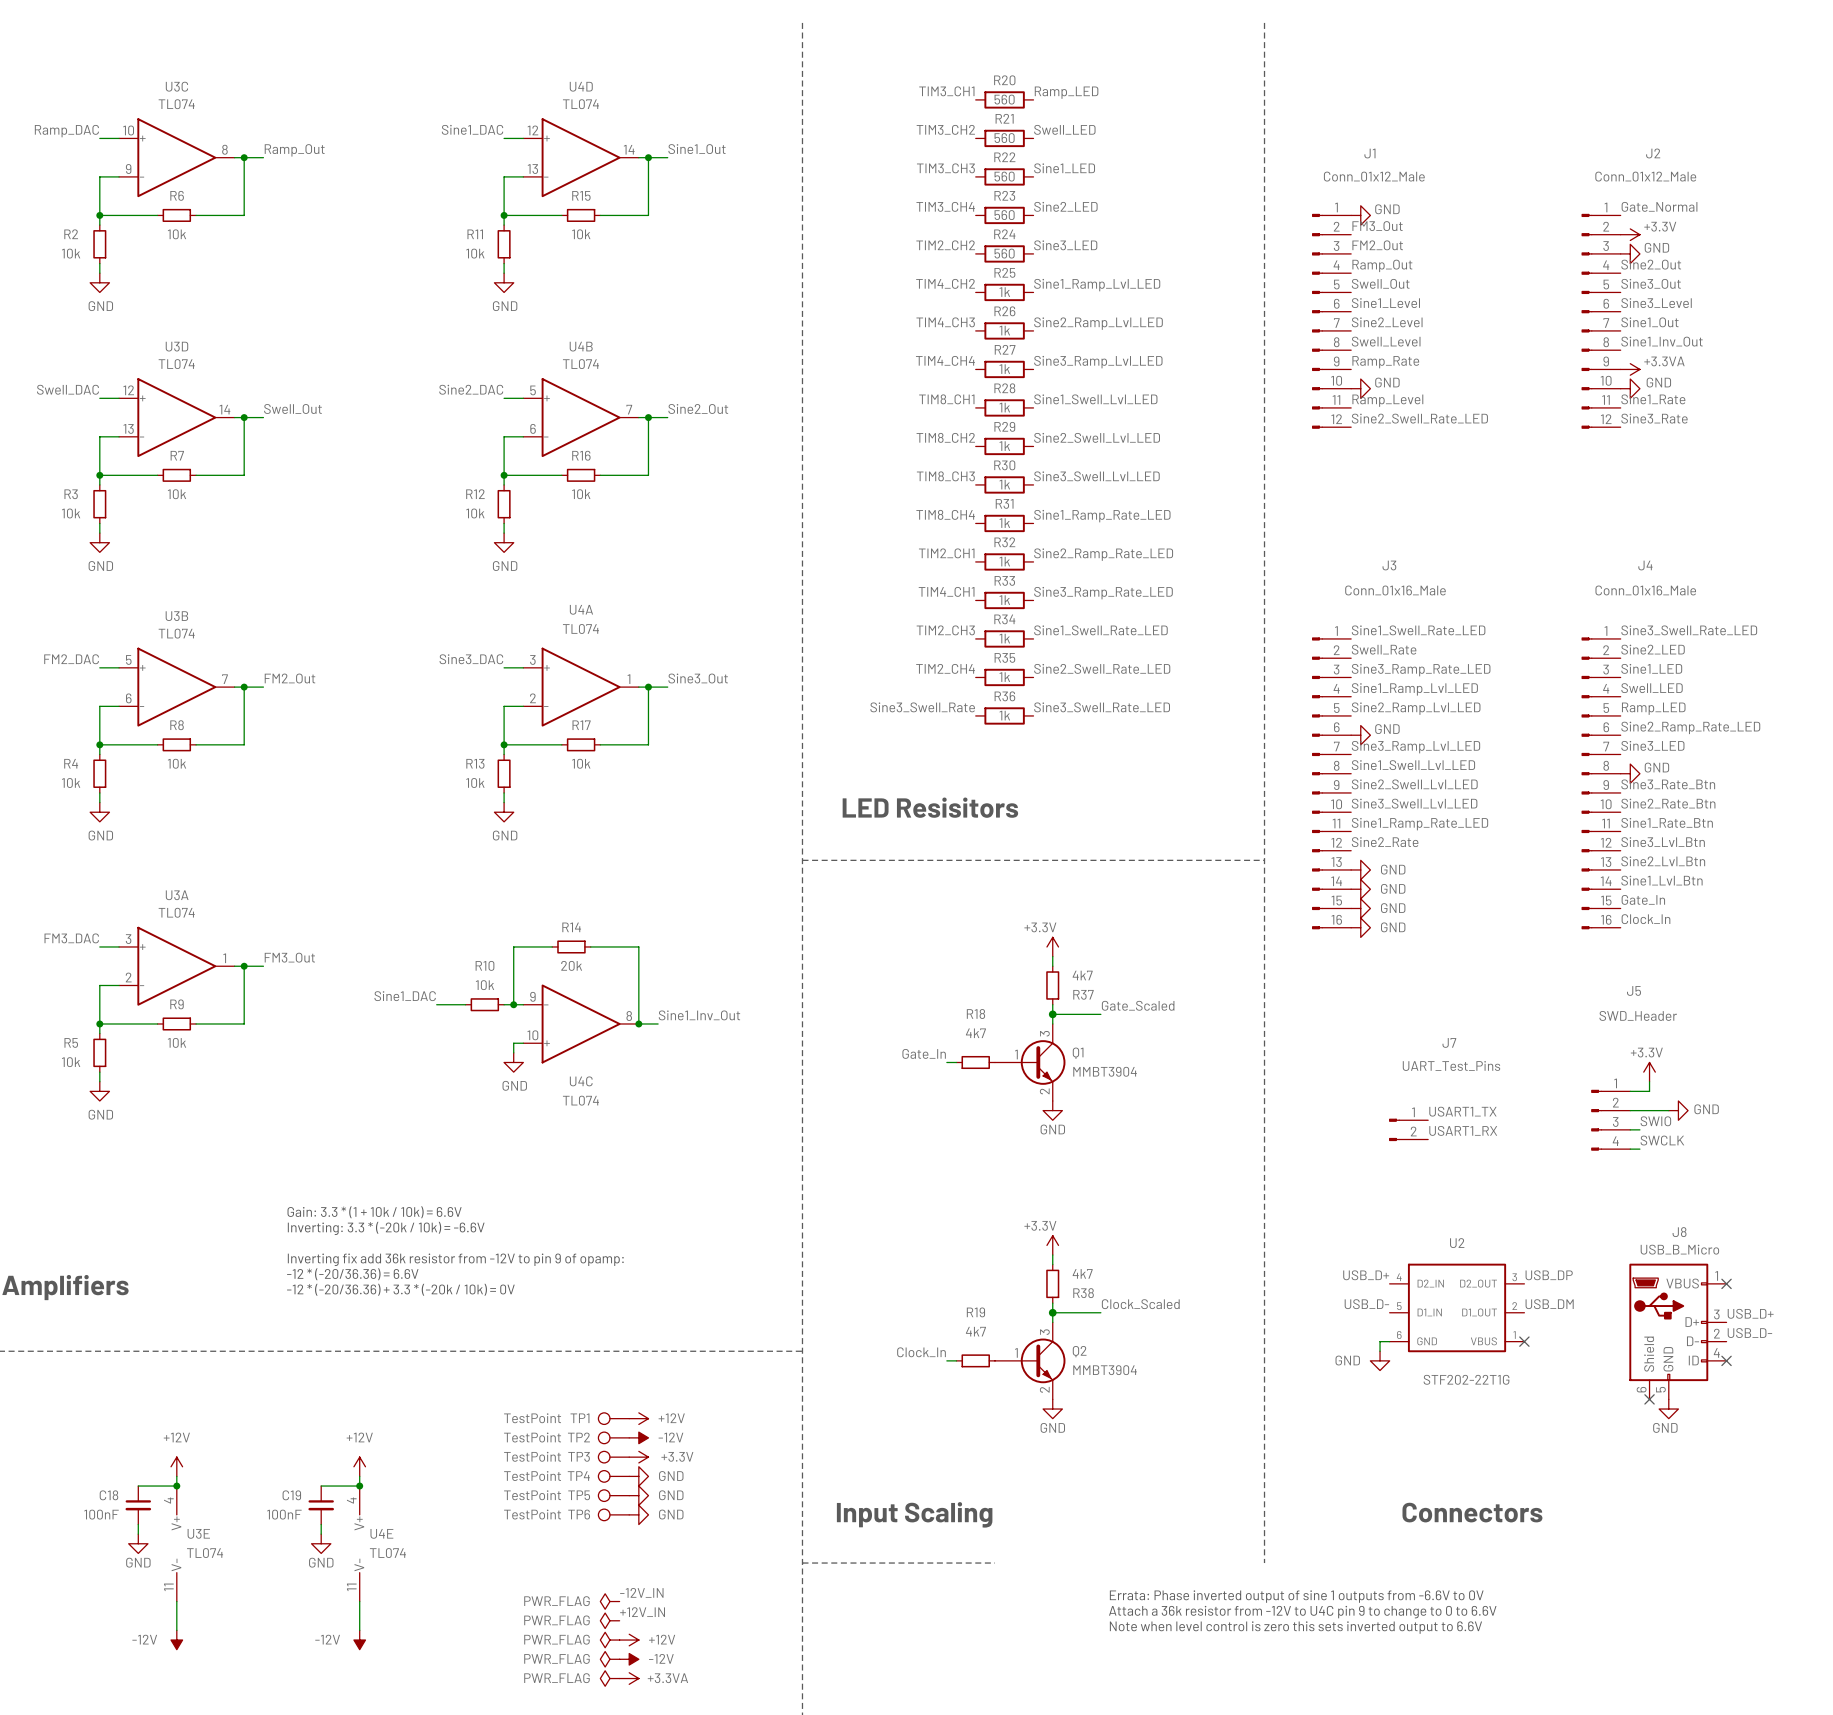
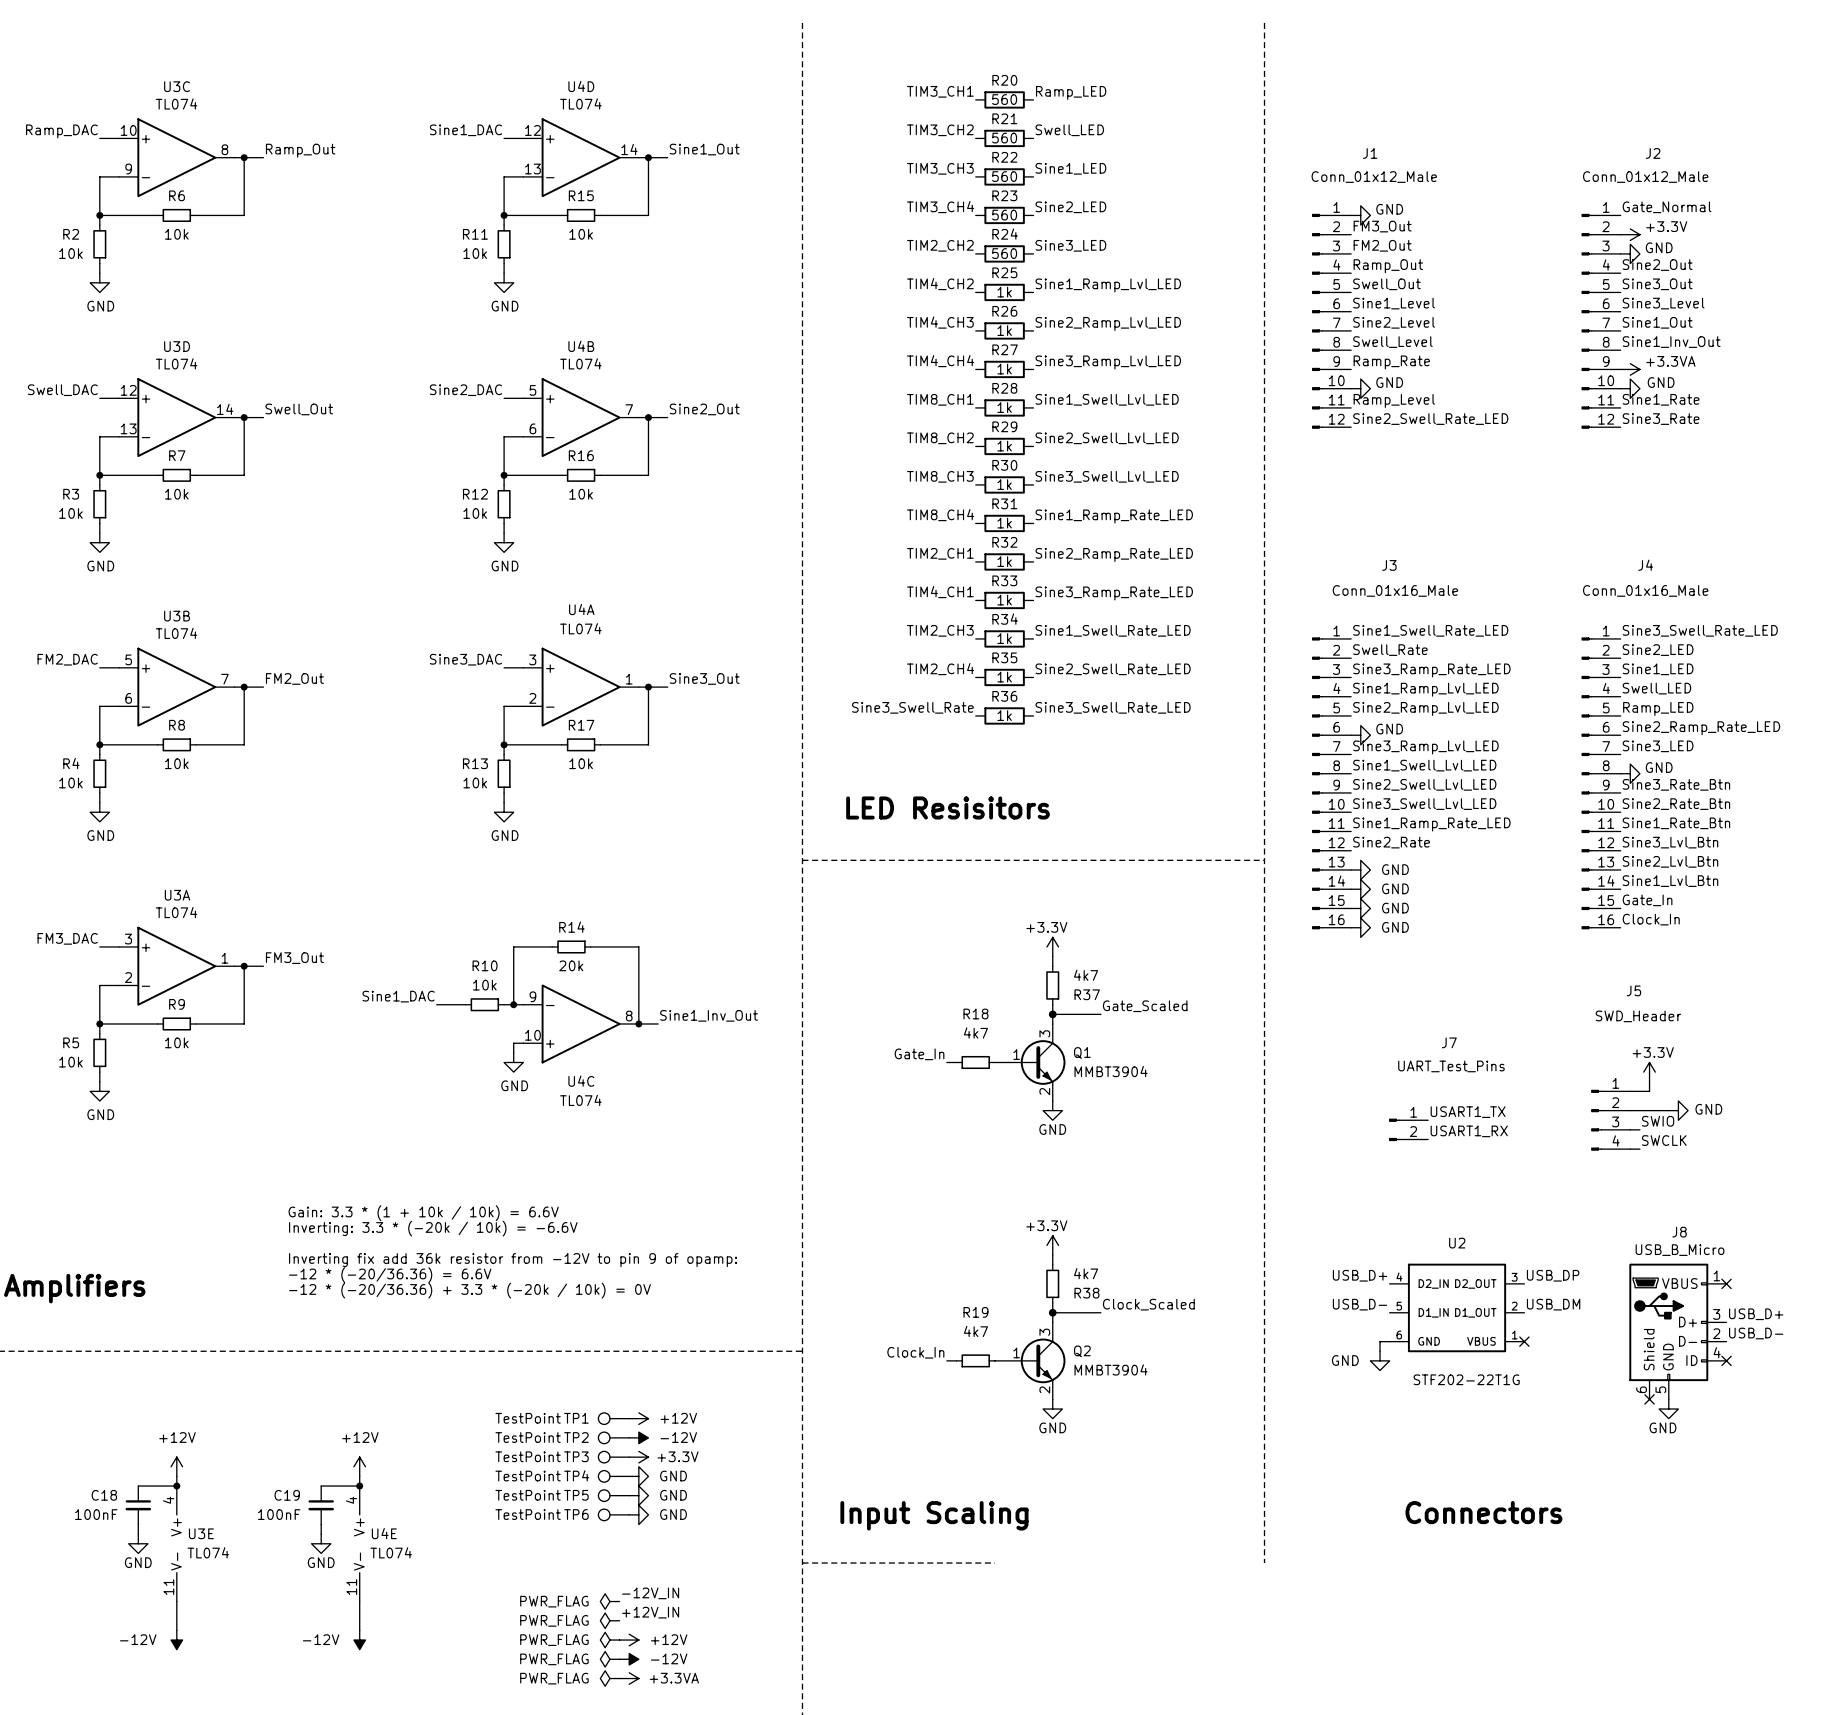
text: Errata: Phase inverted output of sine 1 outputs from -6.6V to 0V (1296, 1596) -> none
text: Attach a 36k resistor from -12V to U4C pin 9 to change to 0 to 6.6V (1302, 1612) -> none
text: Note when level control is zero this sets inverted output to 6.6V (1295, 1627) -> none

